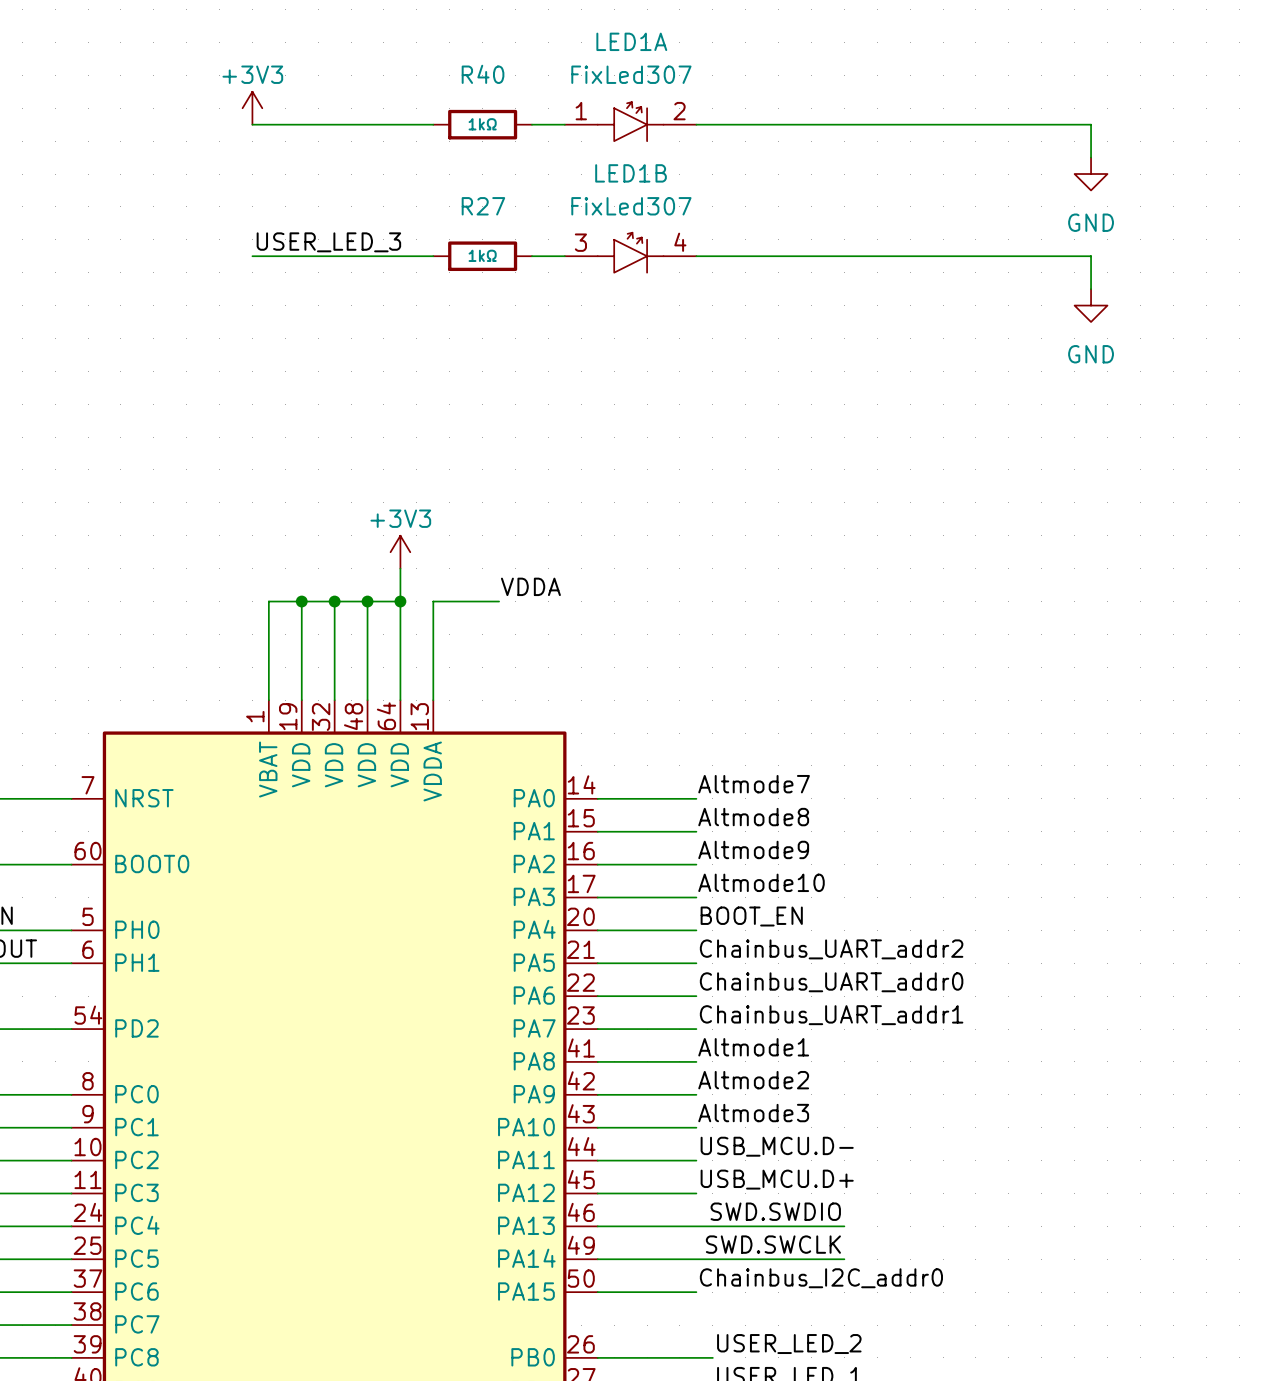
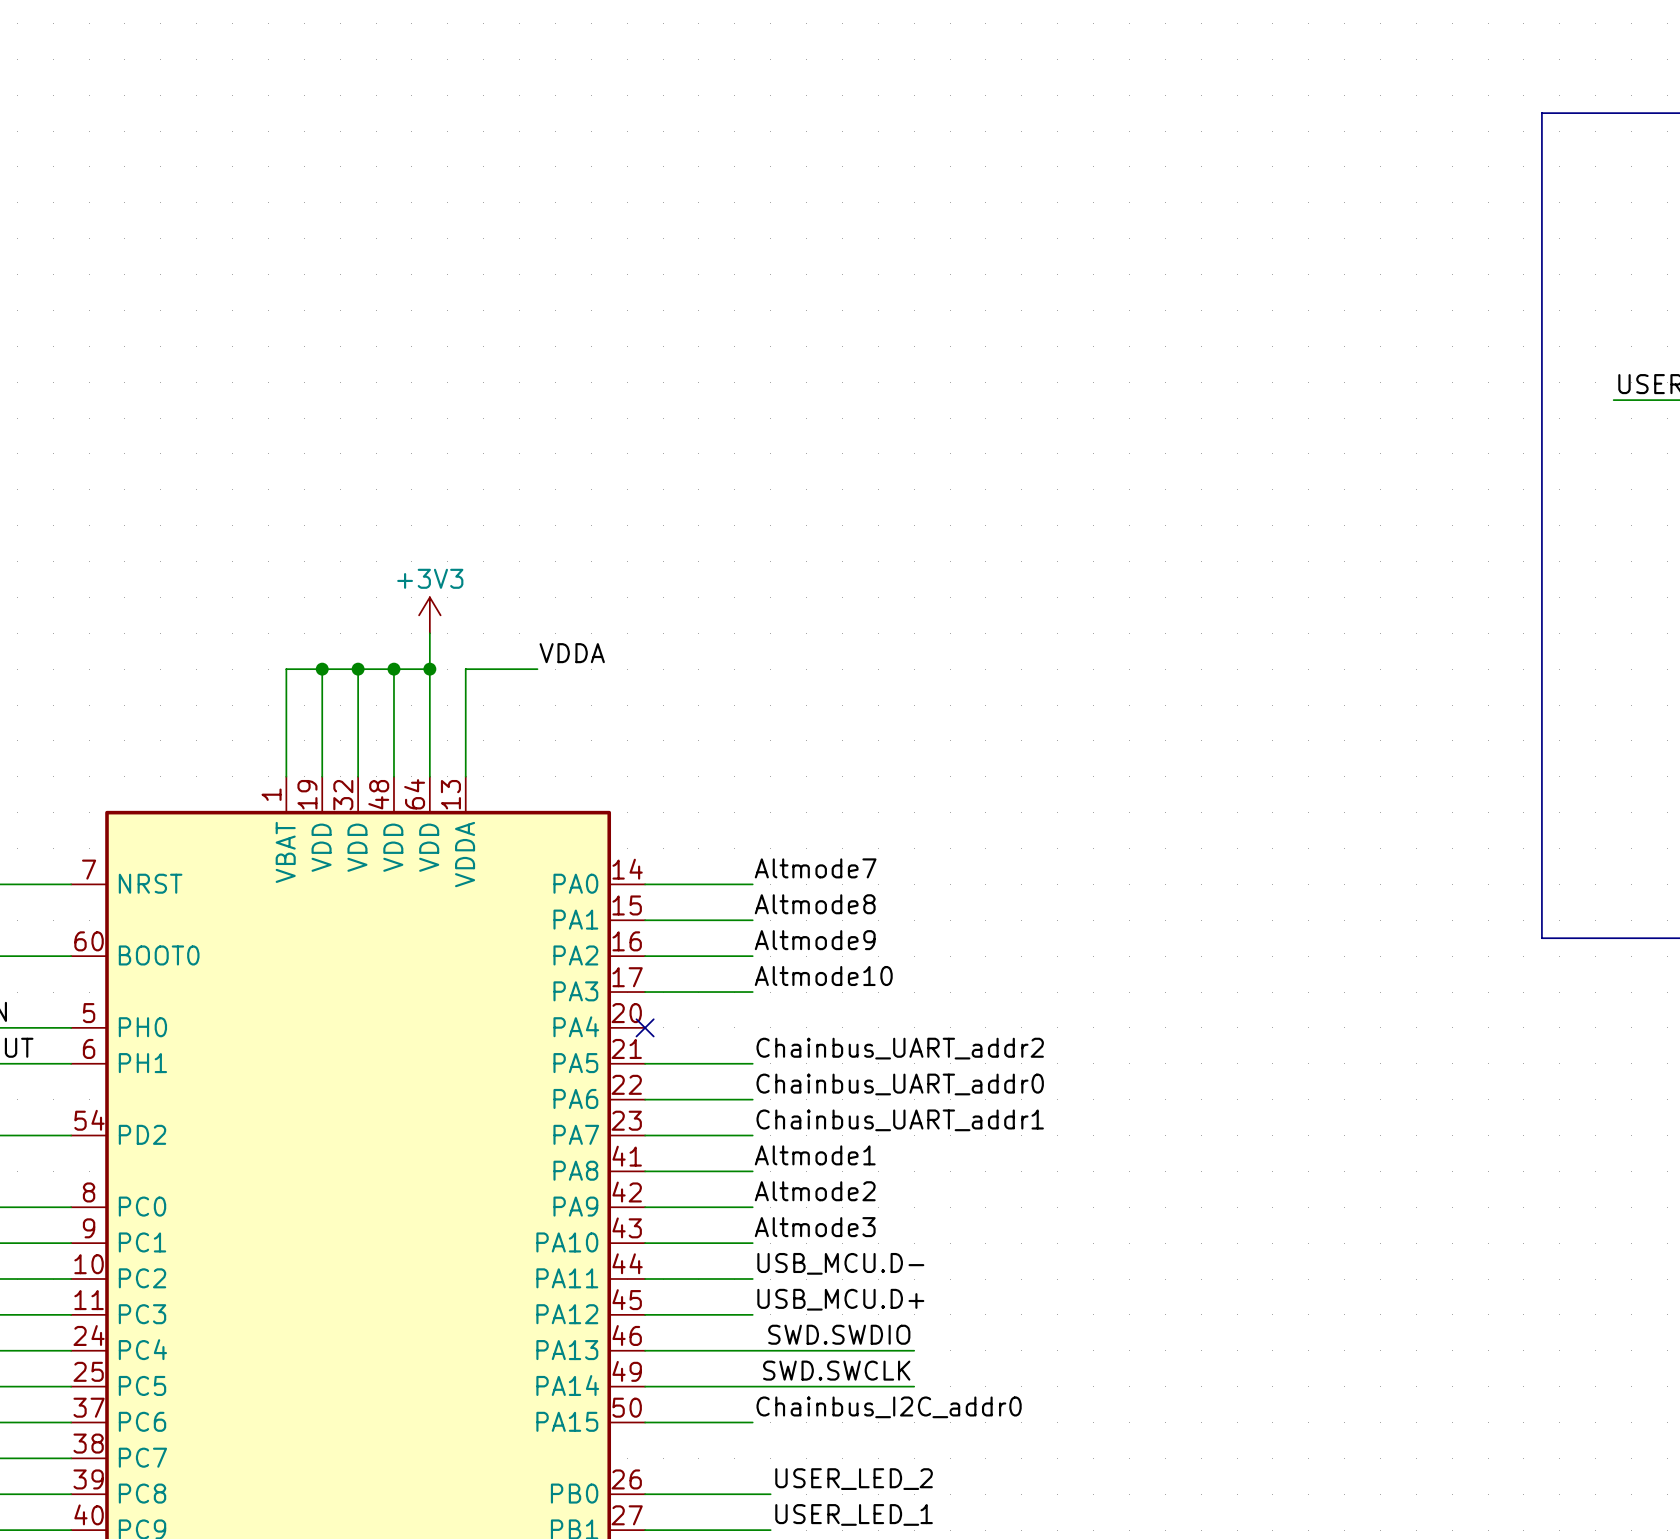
power symbol: +3V3 (252, 108) -> none
LED1A: FixLed307 (630, 121) -> none
wire: (252, 124) (433, 124) -> none
R40: 1kΩ (482, 124) -> none
wire: (531, 124) (564, 124) -> none
wire: (696, 124) (1091, 124) (1091, 157) -> none
power symbol: GND (1091, 174) -> none
label: USER_LED_3 (328, 242) -> none
LED1B: FixLed307 (630, 252) -> none
wire: (252, 256) (433, 256) -> none
R27: 1kΩ (482, 256) -> none
wire: (531, 256) (564, 256) -> none
wire: (696, 256) (1091, 256) (1091, 289) -> none
power symbol: GND (1091, 305) -> none
label: BOOT_EN (751, 916) -> none
wire: (597, 930) (696, 930) -> none
no-connect mark: none -> (645, 1027)

